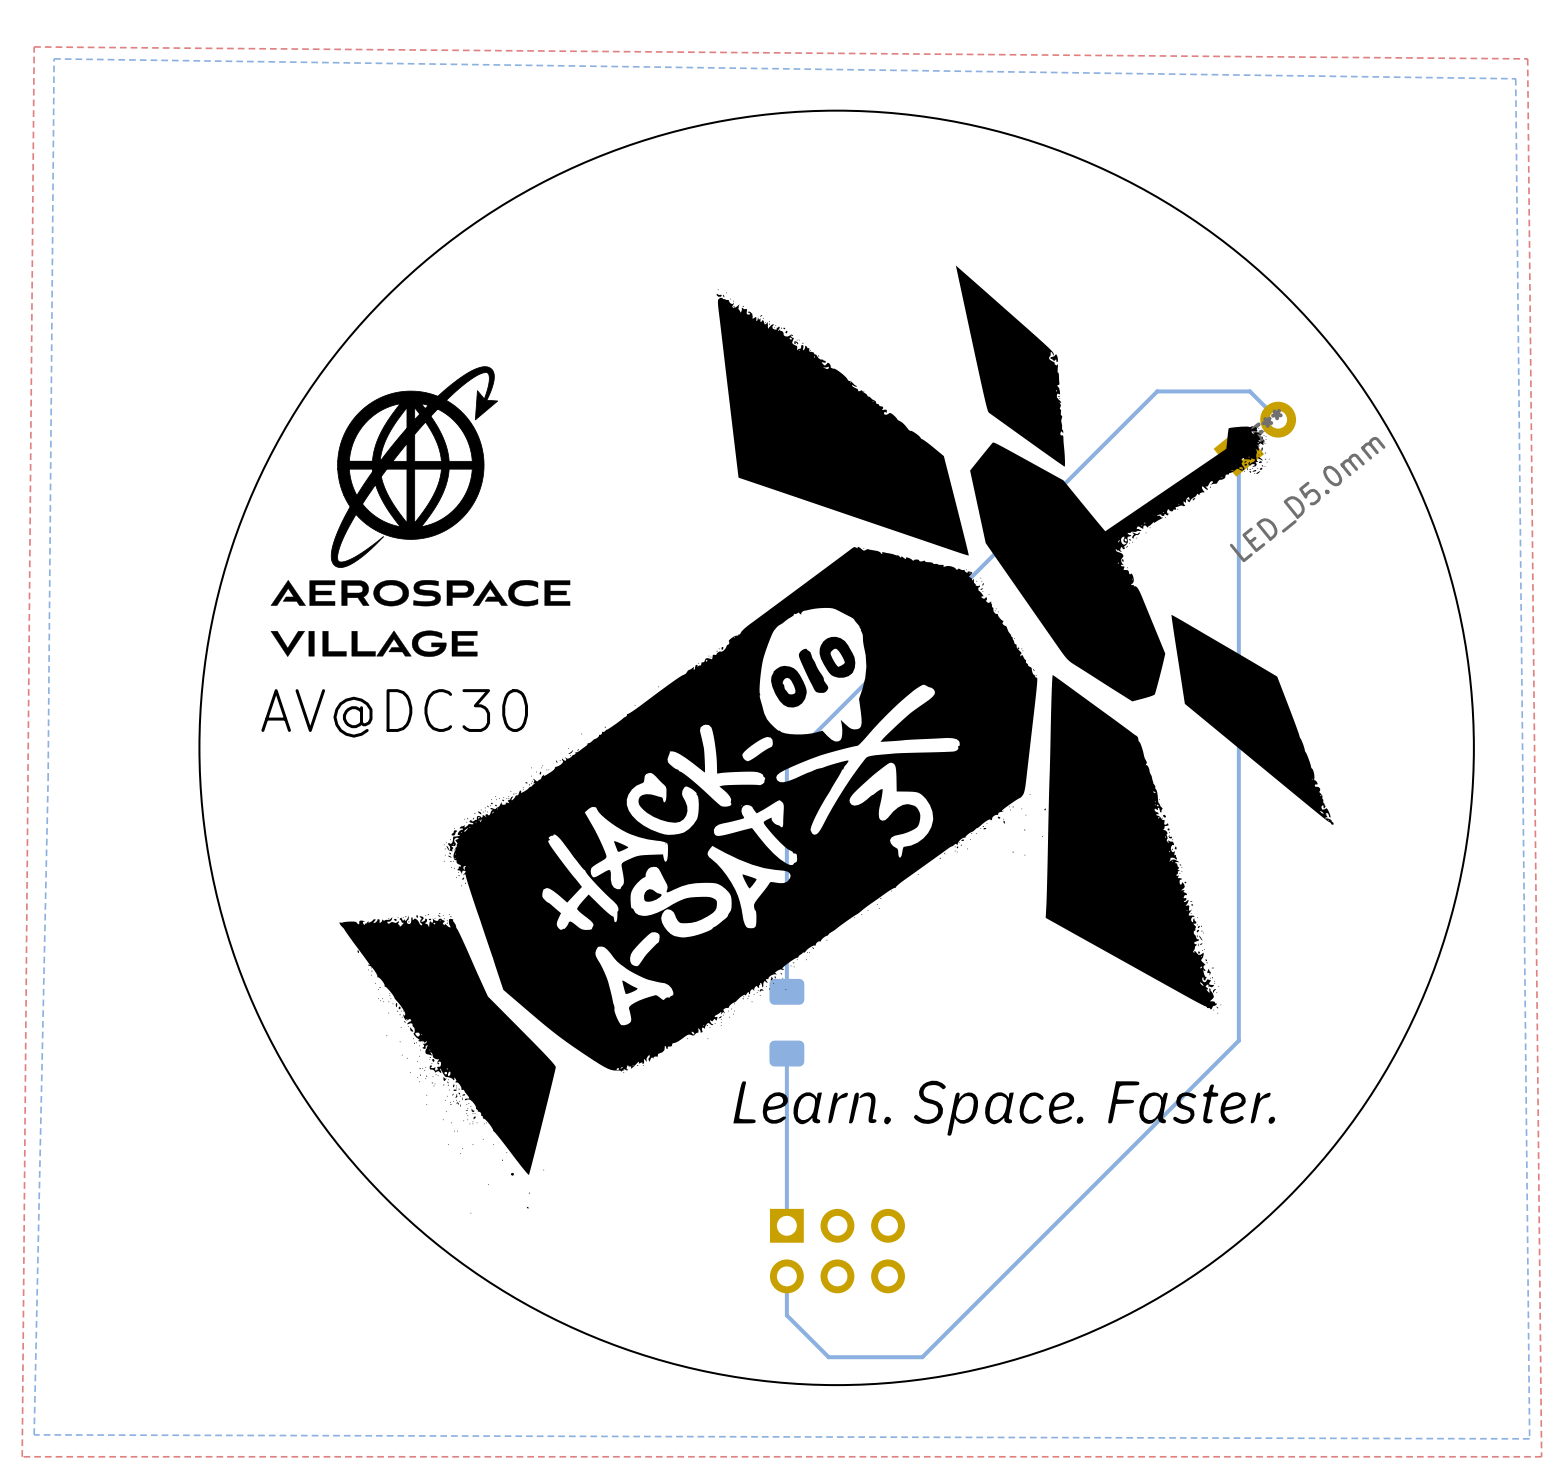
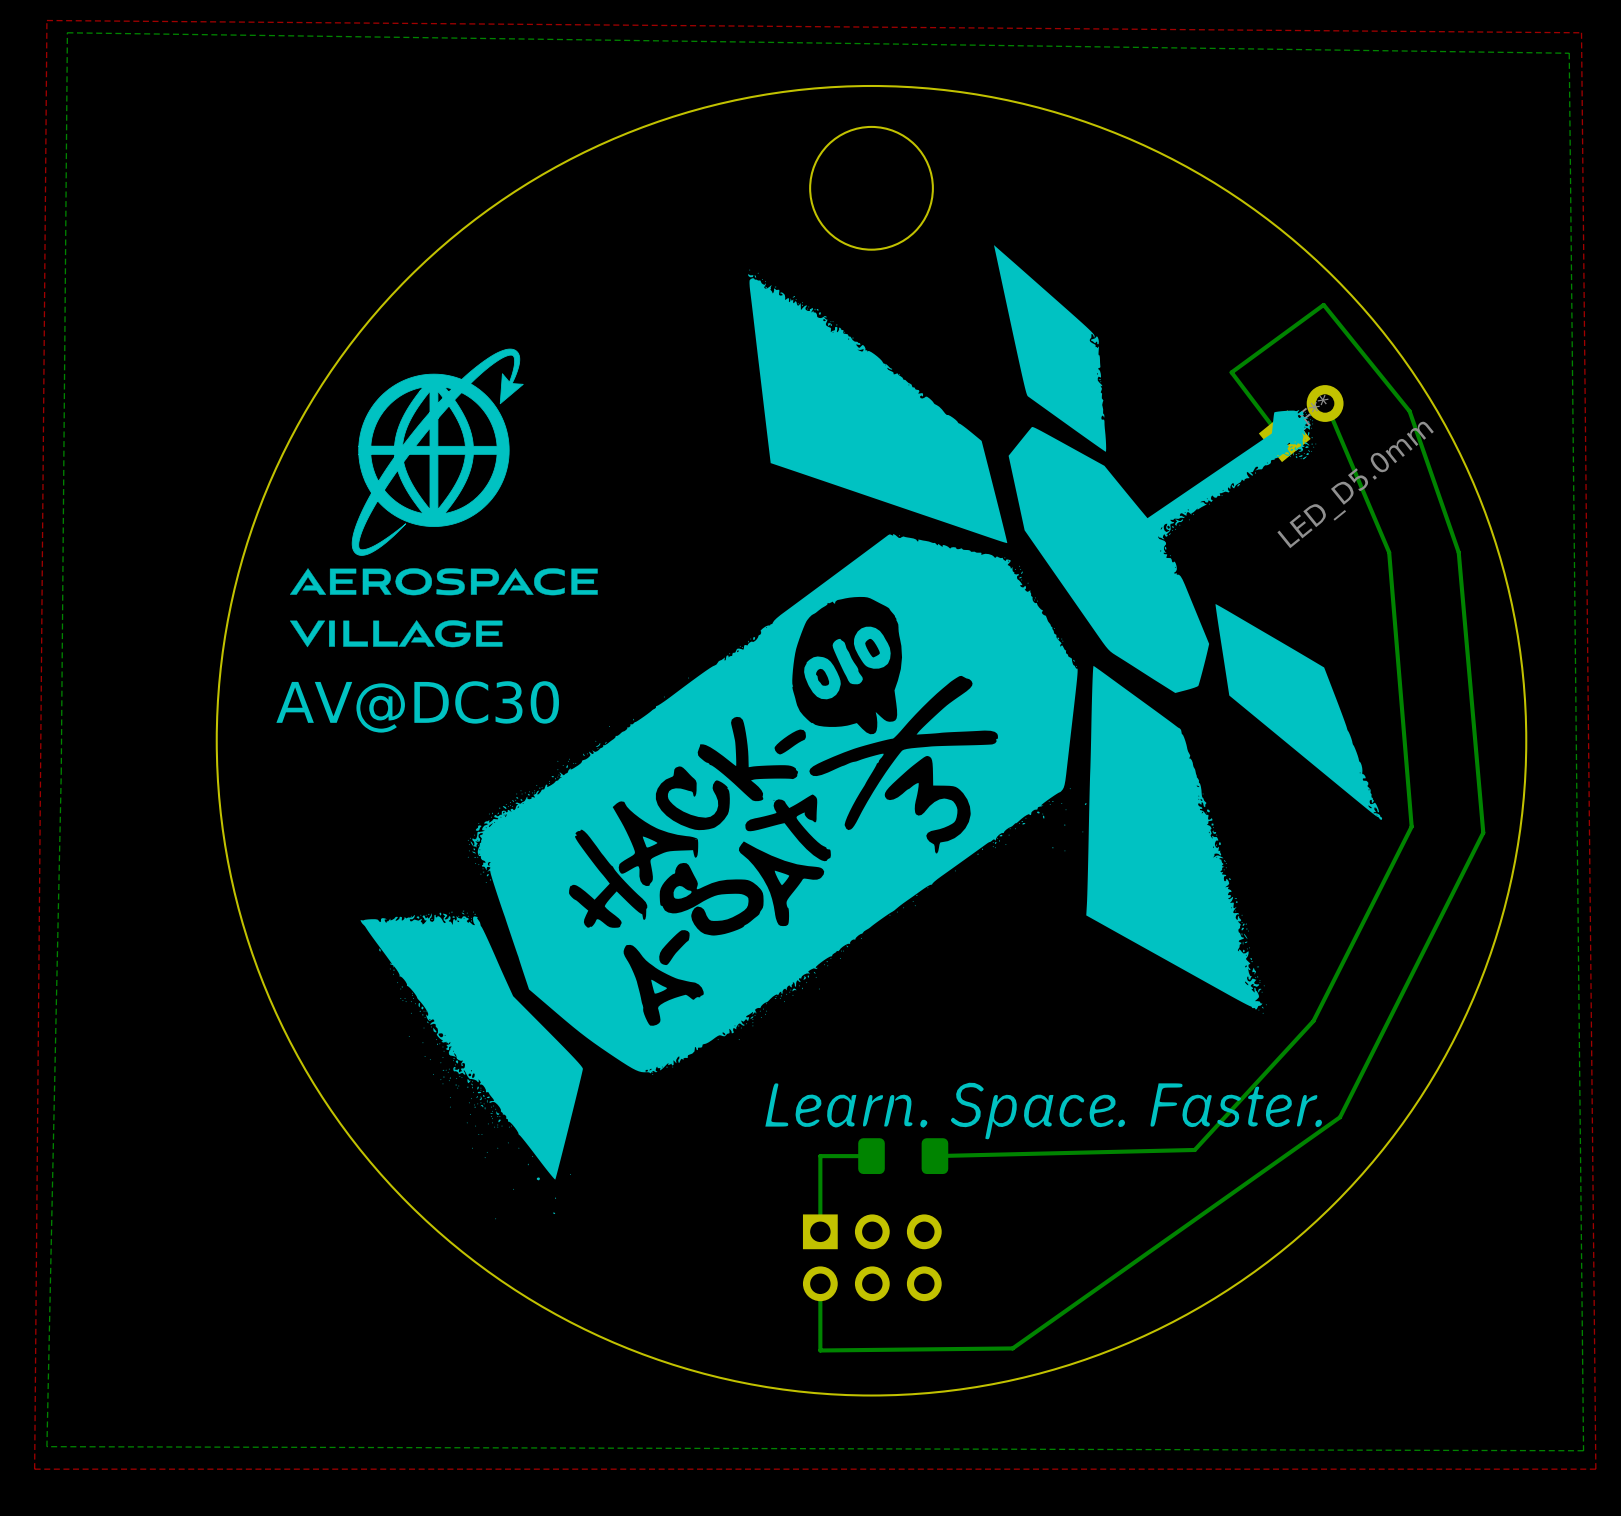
round board edge: none -> [809, 125, 934, 251]
bottom track: (1278, 419) (1249, 391) (1157, 391) (786, 761) (786, 991) -> (1325, 403) (1389, 552) (1411, 826) (1313, 1021) (1194, 1149) (934, 1156)
bottom track: (1238, 451) (1238, 1040) (922, 1357) (828, 1357) (786, 1315) -> (1282, 439) (1231, 372) (1323, 304) (1409, 411) (1458, 552) (1483, 832) (1340, 1117) (1012, 1348) (820, 1350) (820, 1323)
part rotation: 0° (786, 1022) -> 90° clockwise (903, 1156)
part position: (786, 1022) -> (903, 1156)
bottom track: (786, 1053) (786, 1152) -> (873, 1156) (820, 1156)

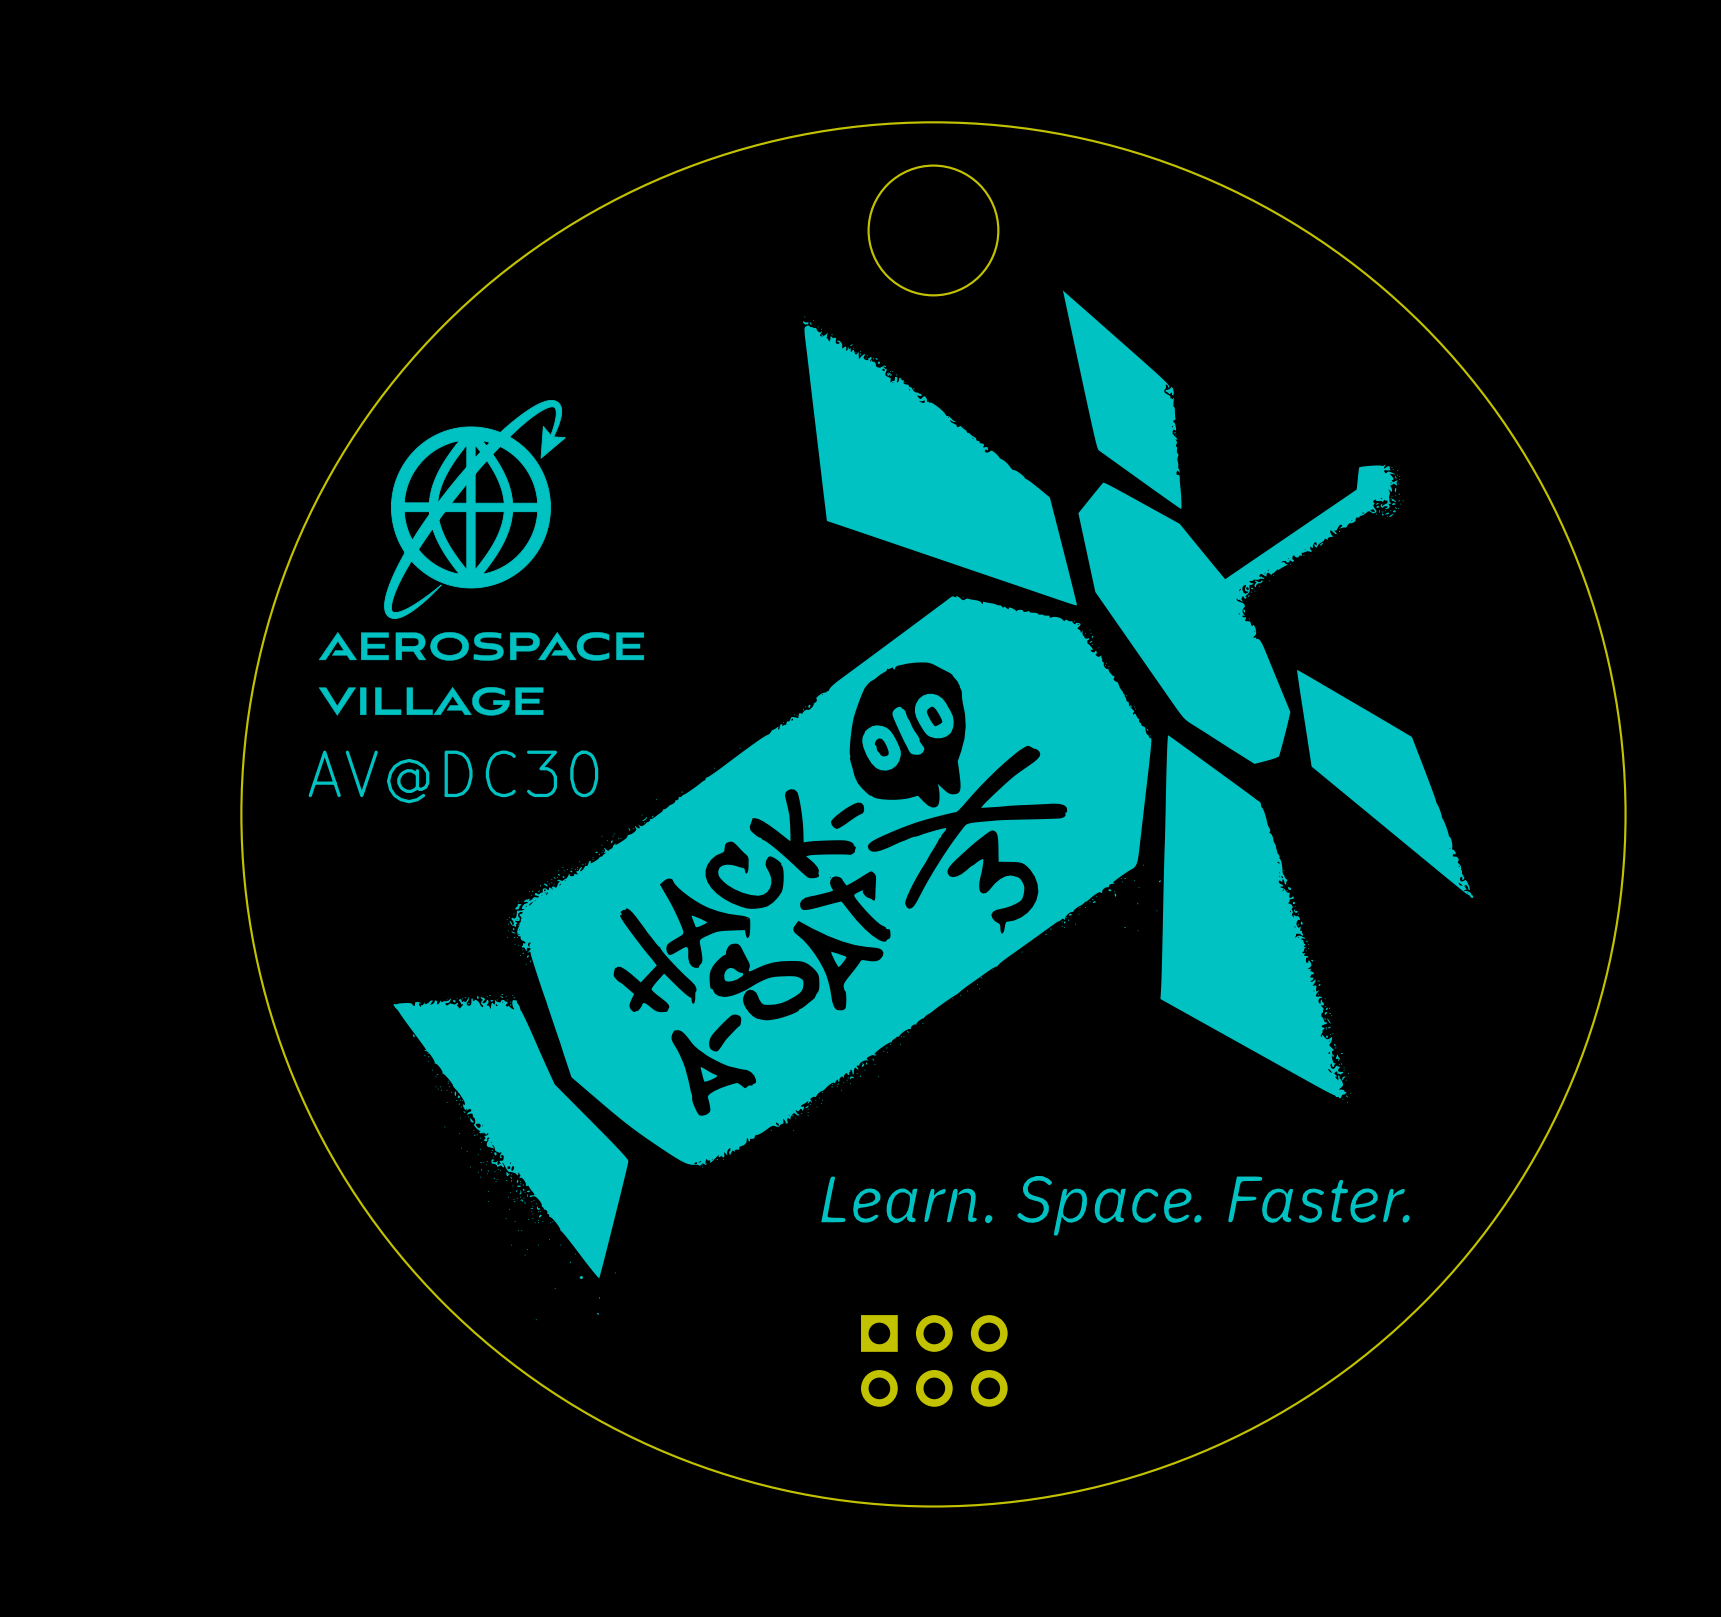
top zone outline: (46, 20) (34, 1469) (1595, 1469) (1581, 32) (46, 20) -> none
bottom zone outline: (67, 32) (61, 773) (46, 1446) (1583, 1450) (1569, 53) (67, 32) -> none
bottom track: (1325, 403) (1389, 552) (1411, 826) (1313, 1021) (1194, 1149) (934, 1156) -> none
part: LED_D5.0mm (1301, 423) -> none
bottom track: (1282, 439) (1231, 372) (1323, 304) (1409, 411) (1458, 552) (1483, 832) (1340, 1117) (1012, 1348) (820, 1350) (820, 1283) -> none
bottom track: (873, 1156) (820, 1156) (820, 1231) -> none
part: (903, 1156) -> none

